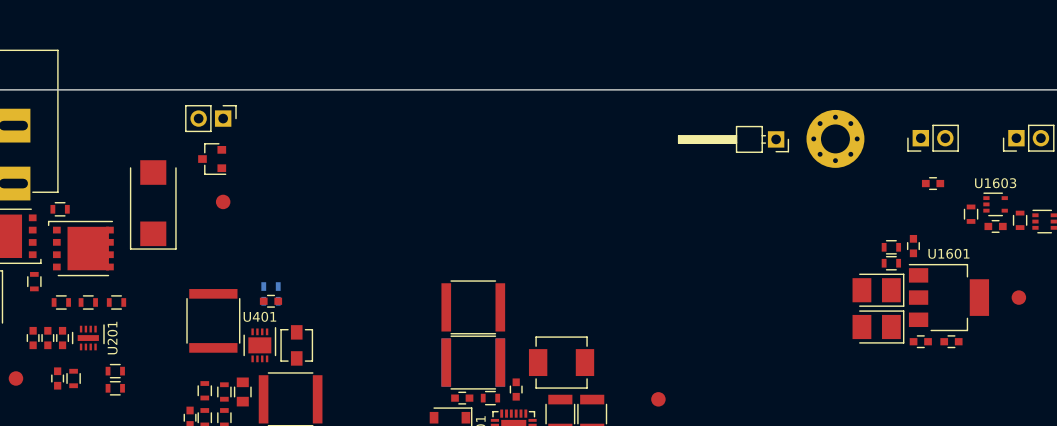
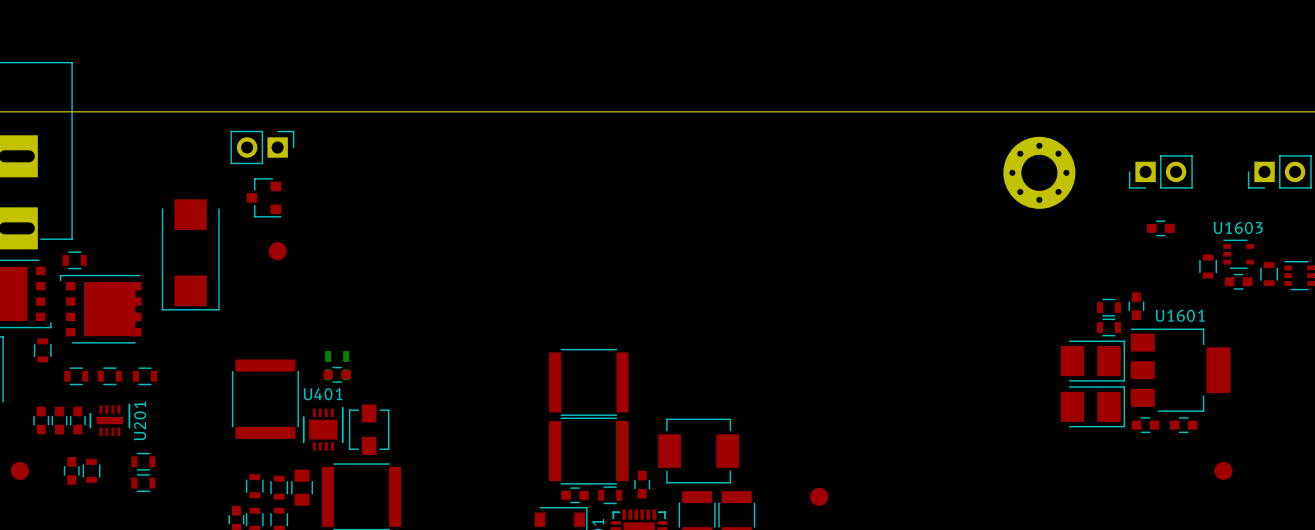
part: (733, 139) -> none
part position: (1018, 297) -> (1223, 470)

